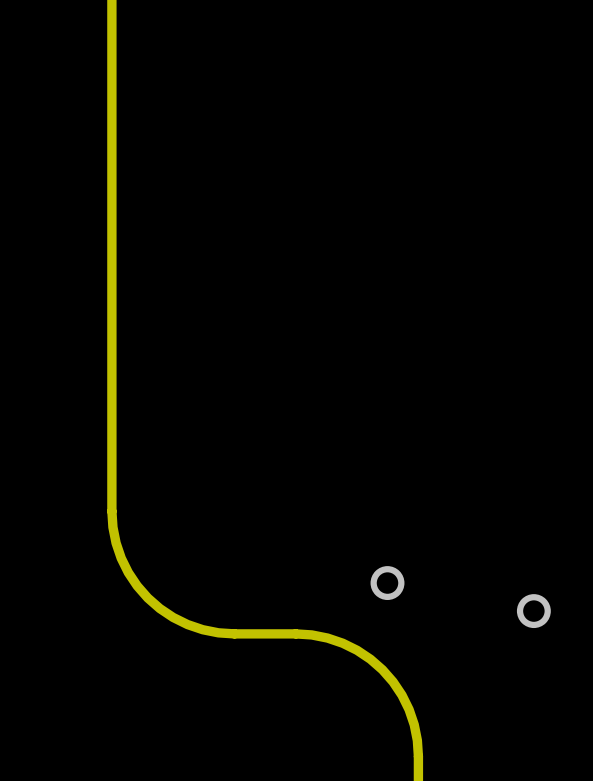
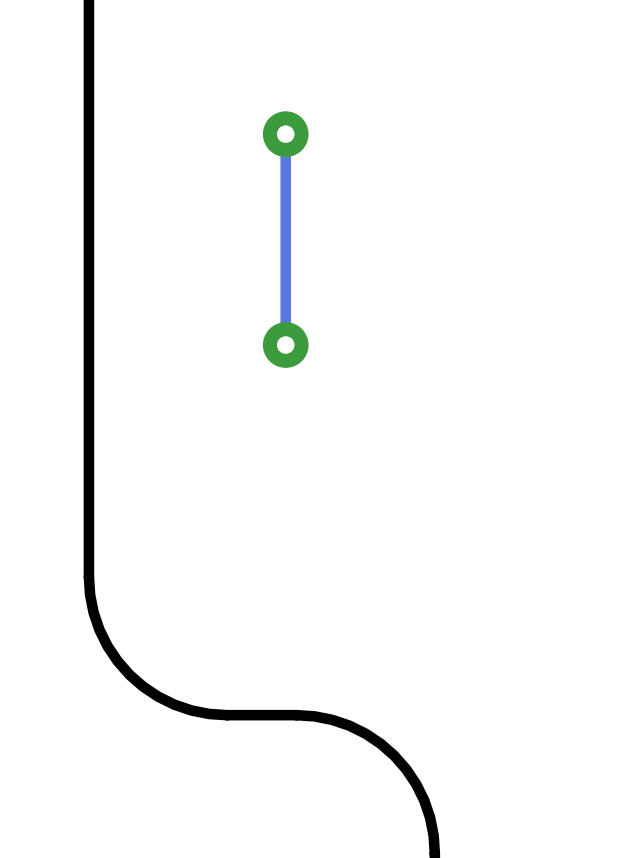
track: none -> (285, 134) (285, 345)
via: none -> (285, 134)
via: none -> (285, 345)
via: (387, 583) -> none
via: (533, 611) -> none

